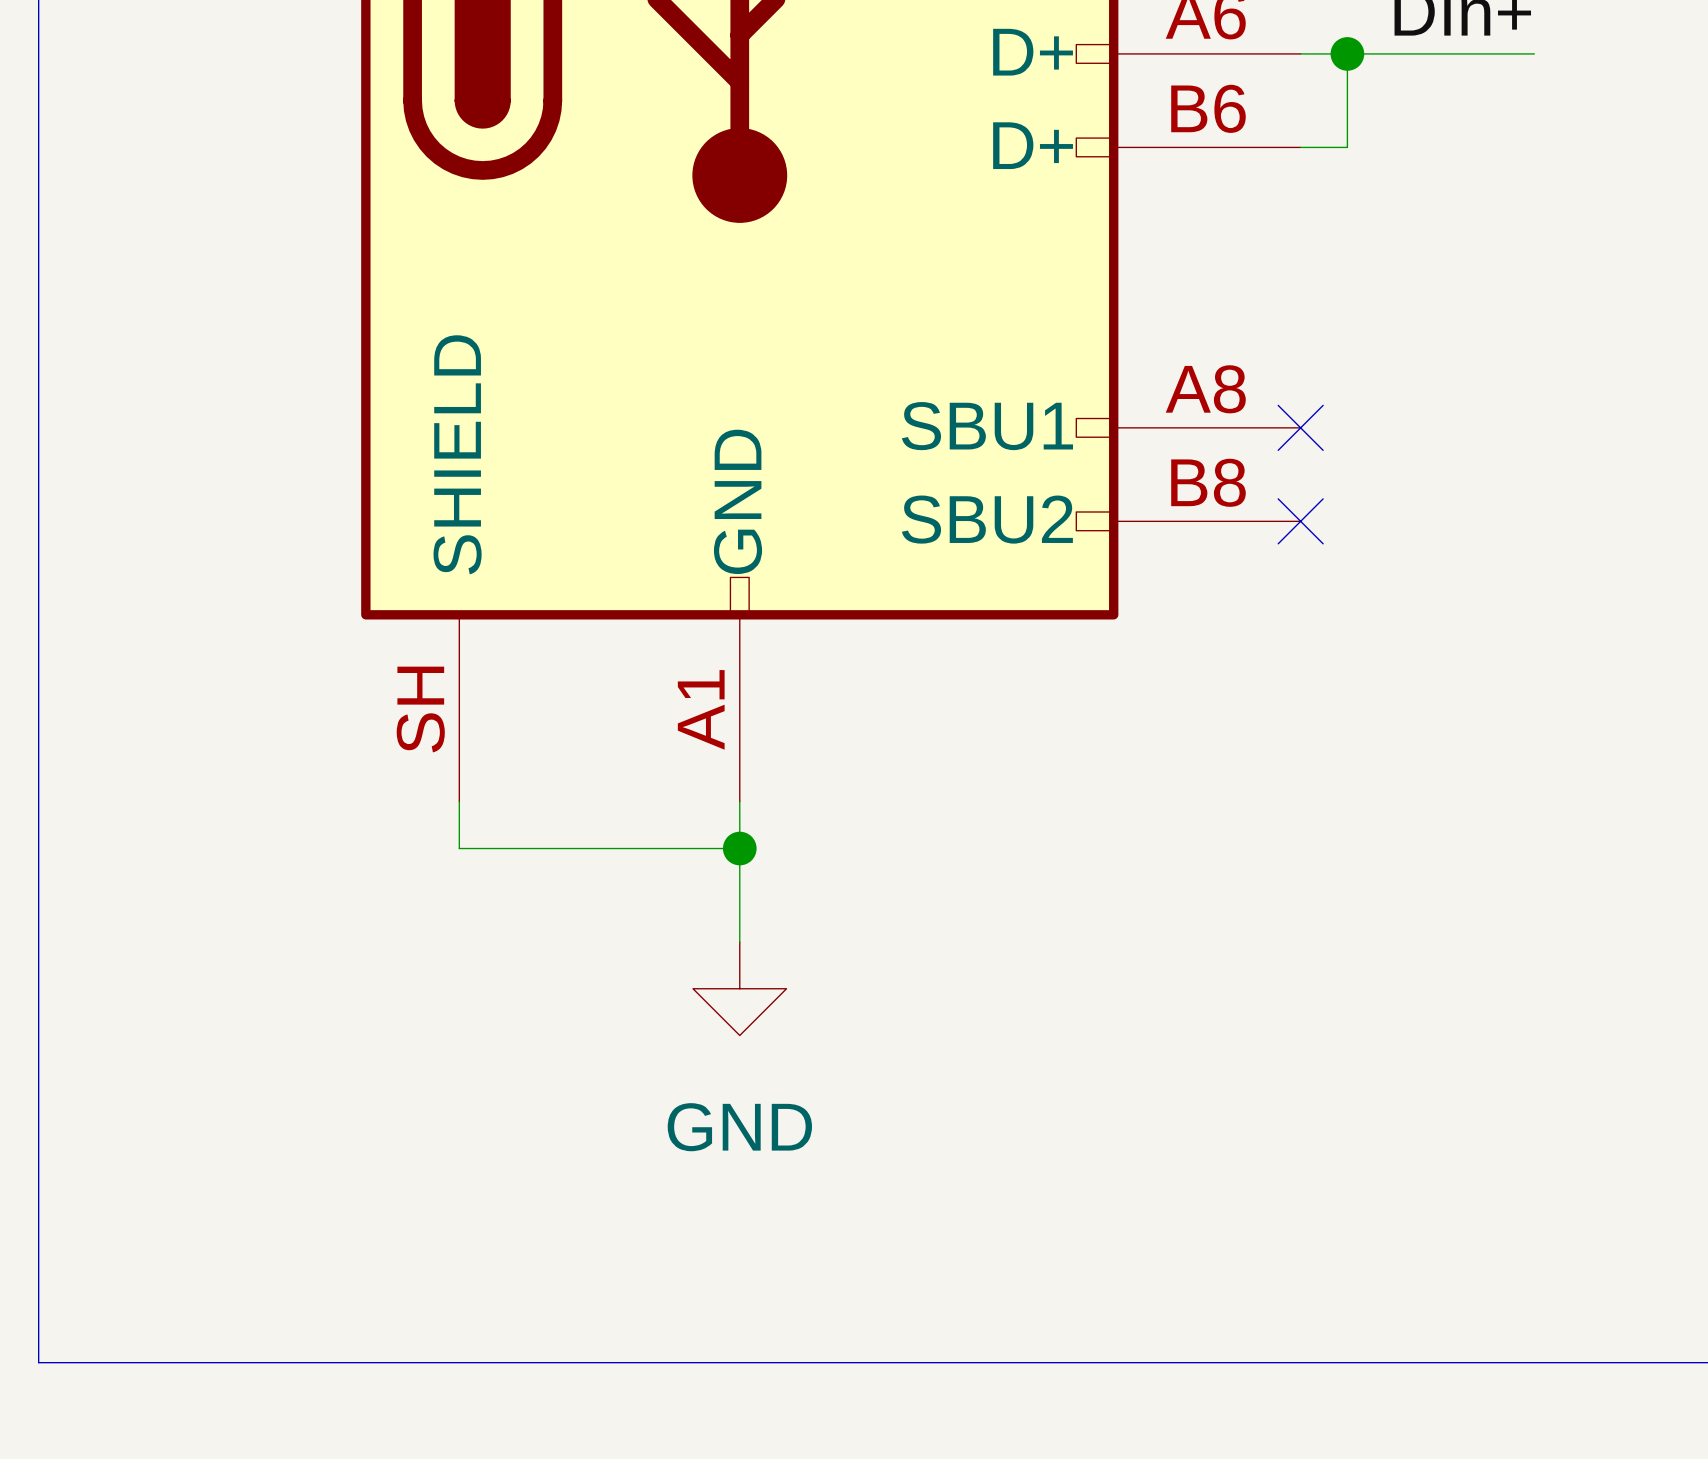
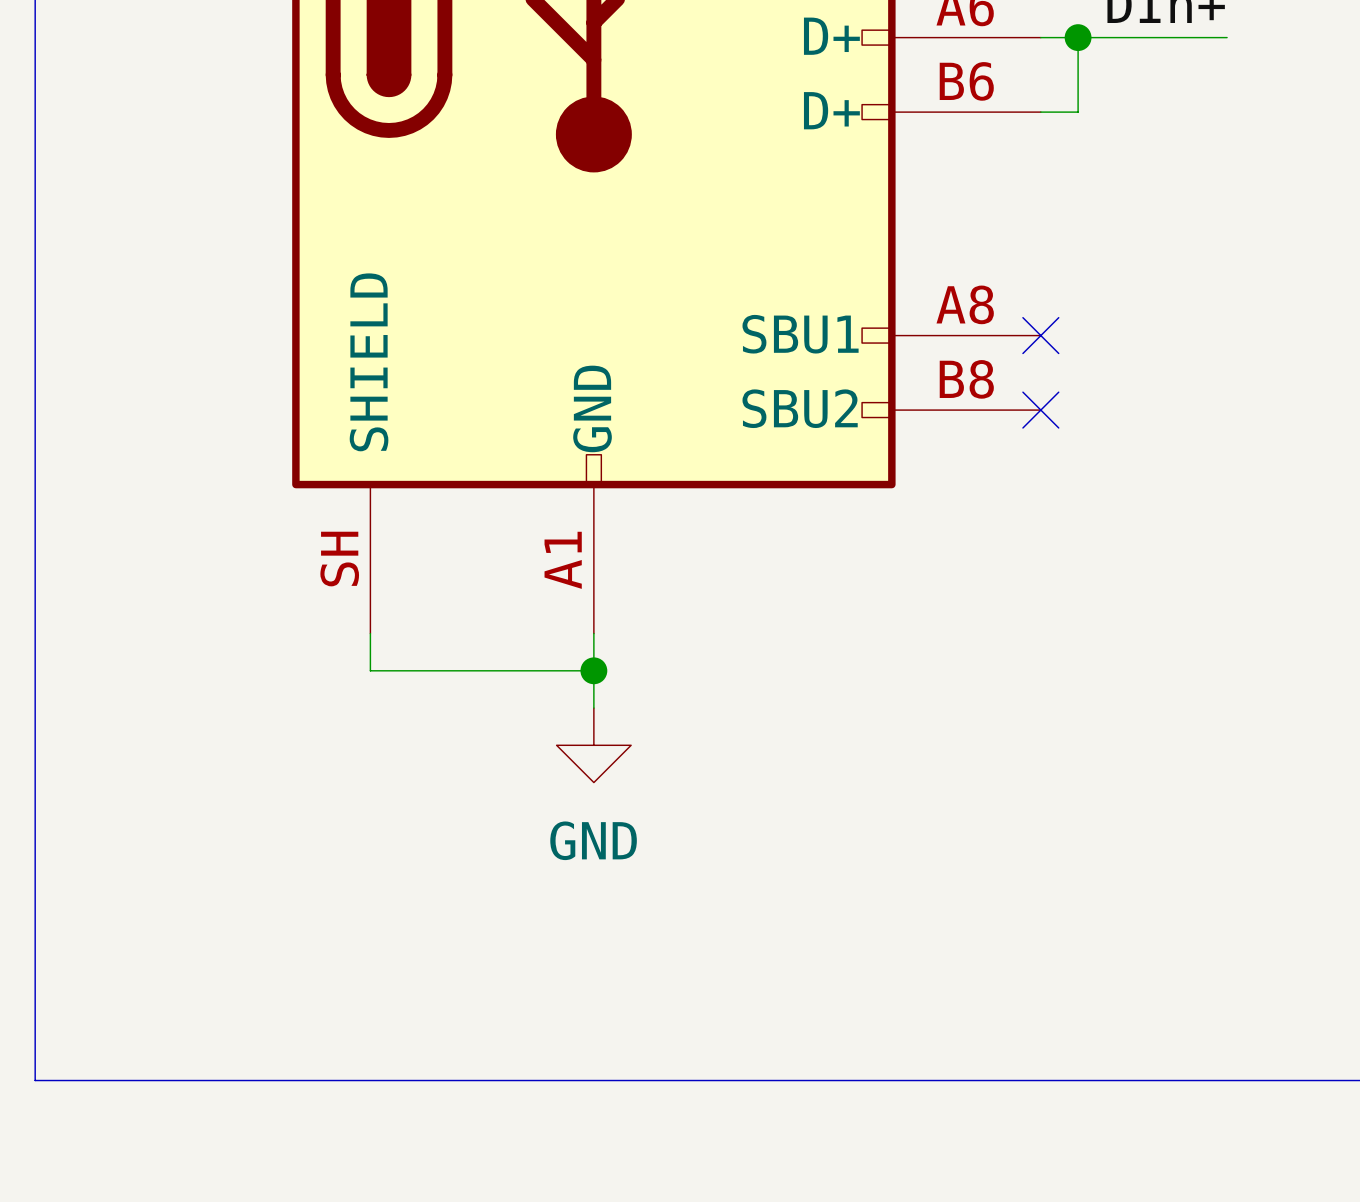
power symbol position: GND (739, 988) -> GND (593, 745)
power symbol text position: GND (739, 1127) -> GND (593, 840)

